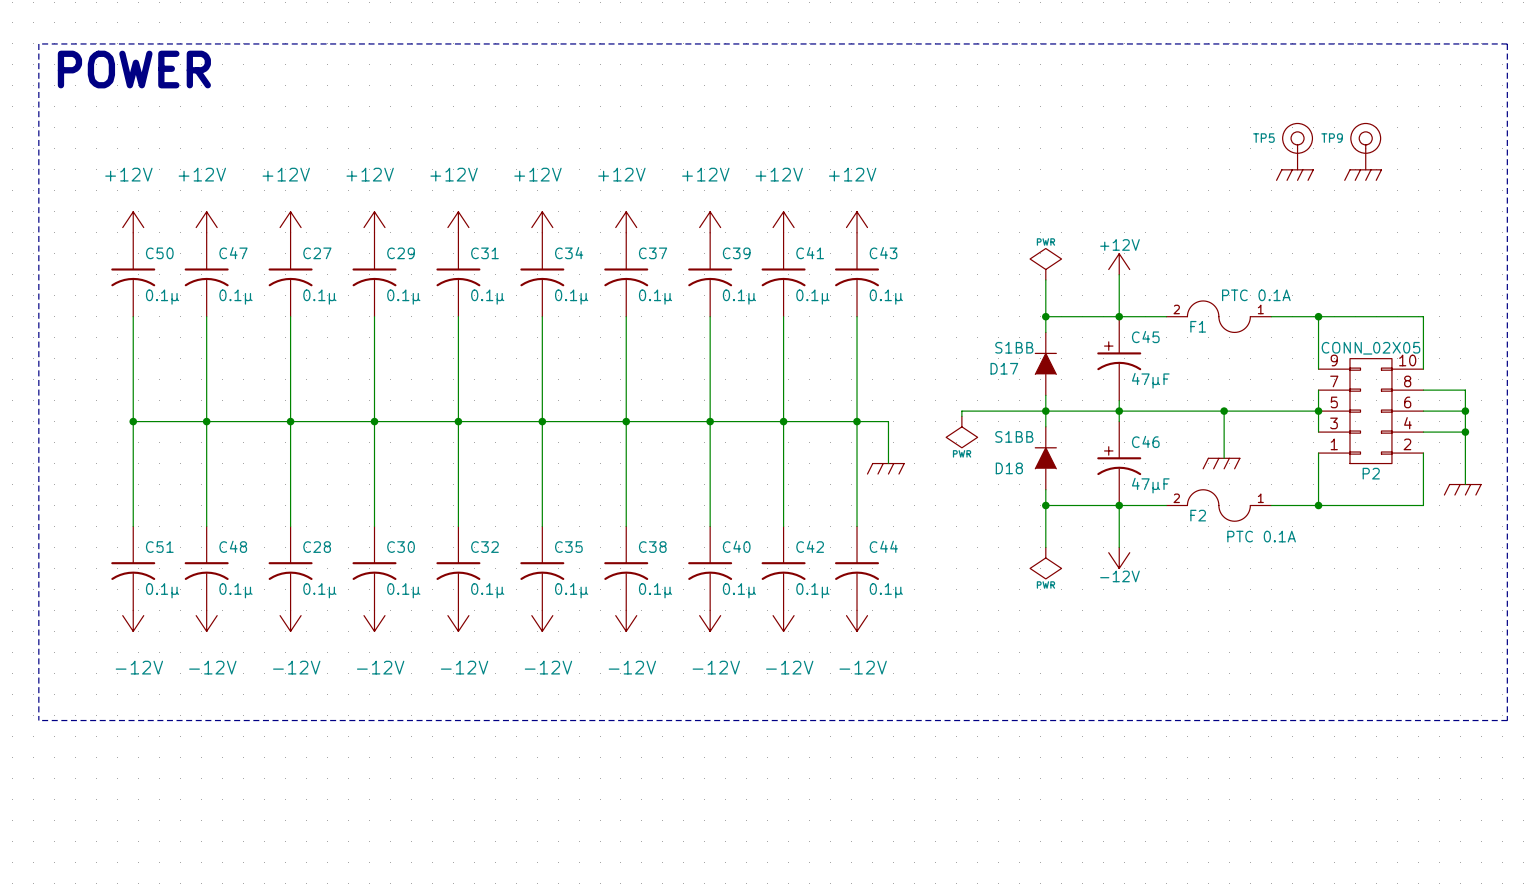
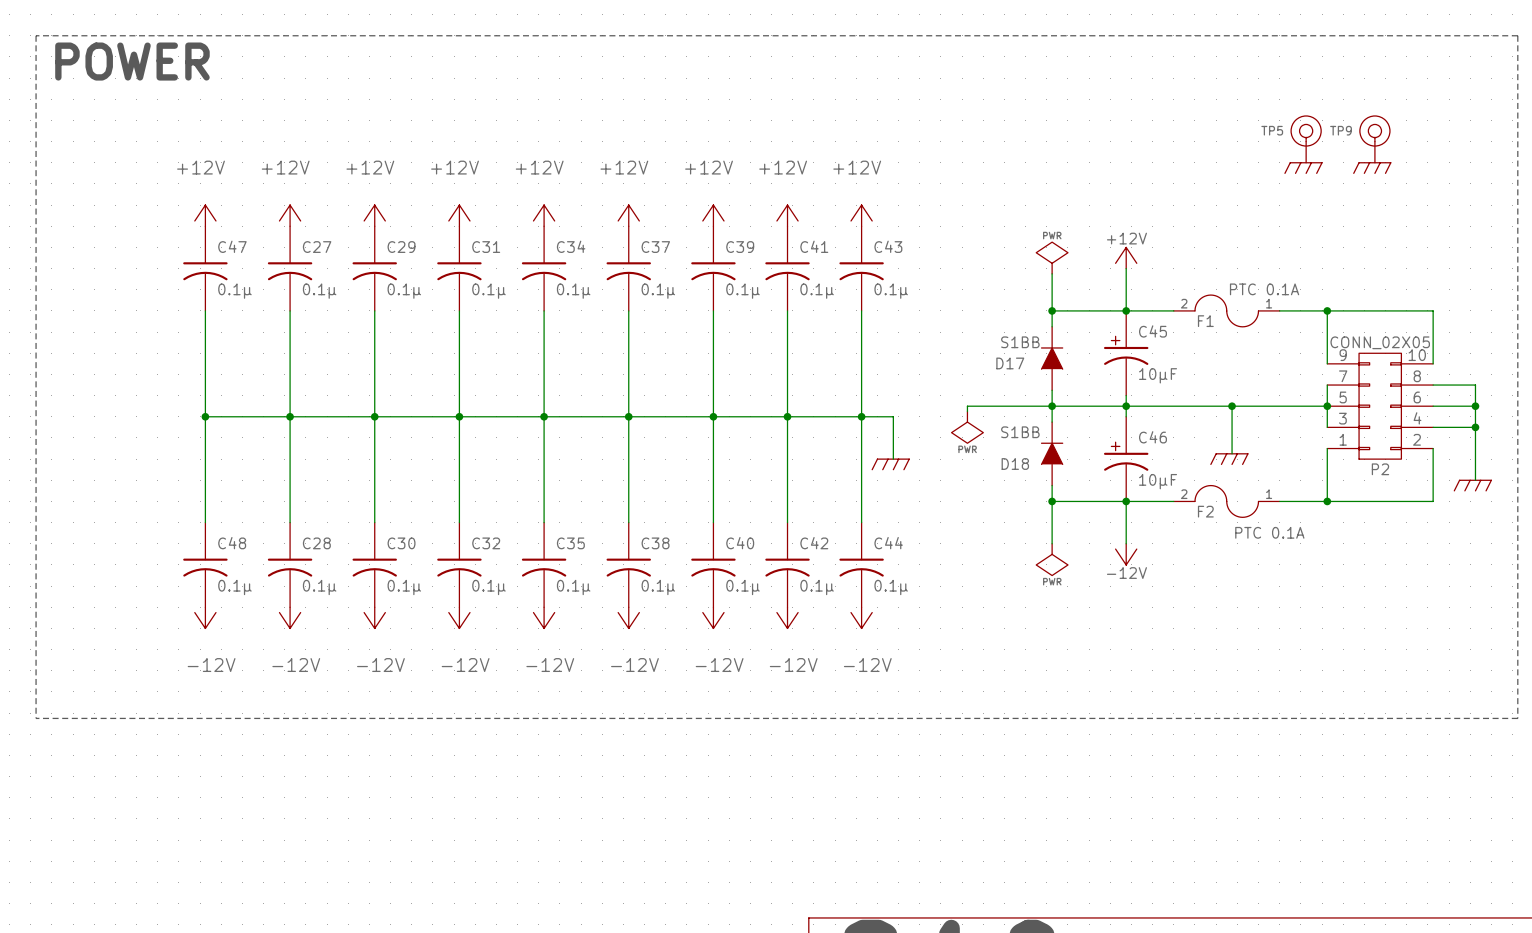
power symbol: +12V (133, 222) -> none
C50: 0.1µ (133, 274) -> none
wire: (133, 316) (133, 526) -> none
C45 value: 47μF (1150, 380) -> 10μF (1158, 375)
wire: (133, 421) (206, 421) -> none
junction: (133, 421) -> none
C46 value: 47μF (1150, 485) -> 10μF (1158, 481)
C51: 0.1µ (133, 568) -> none
power symbol: -12V (133, 620) -> none

